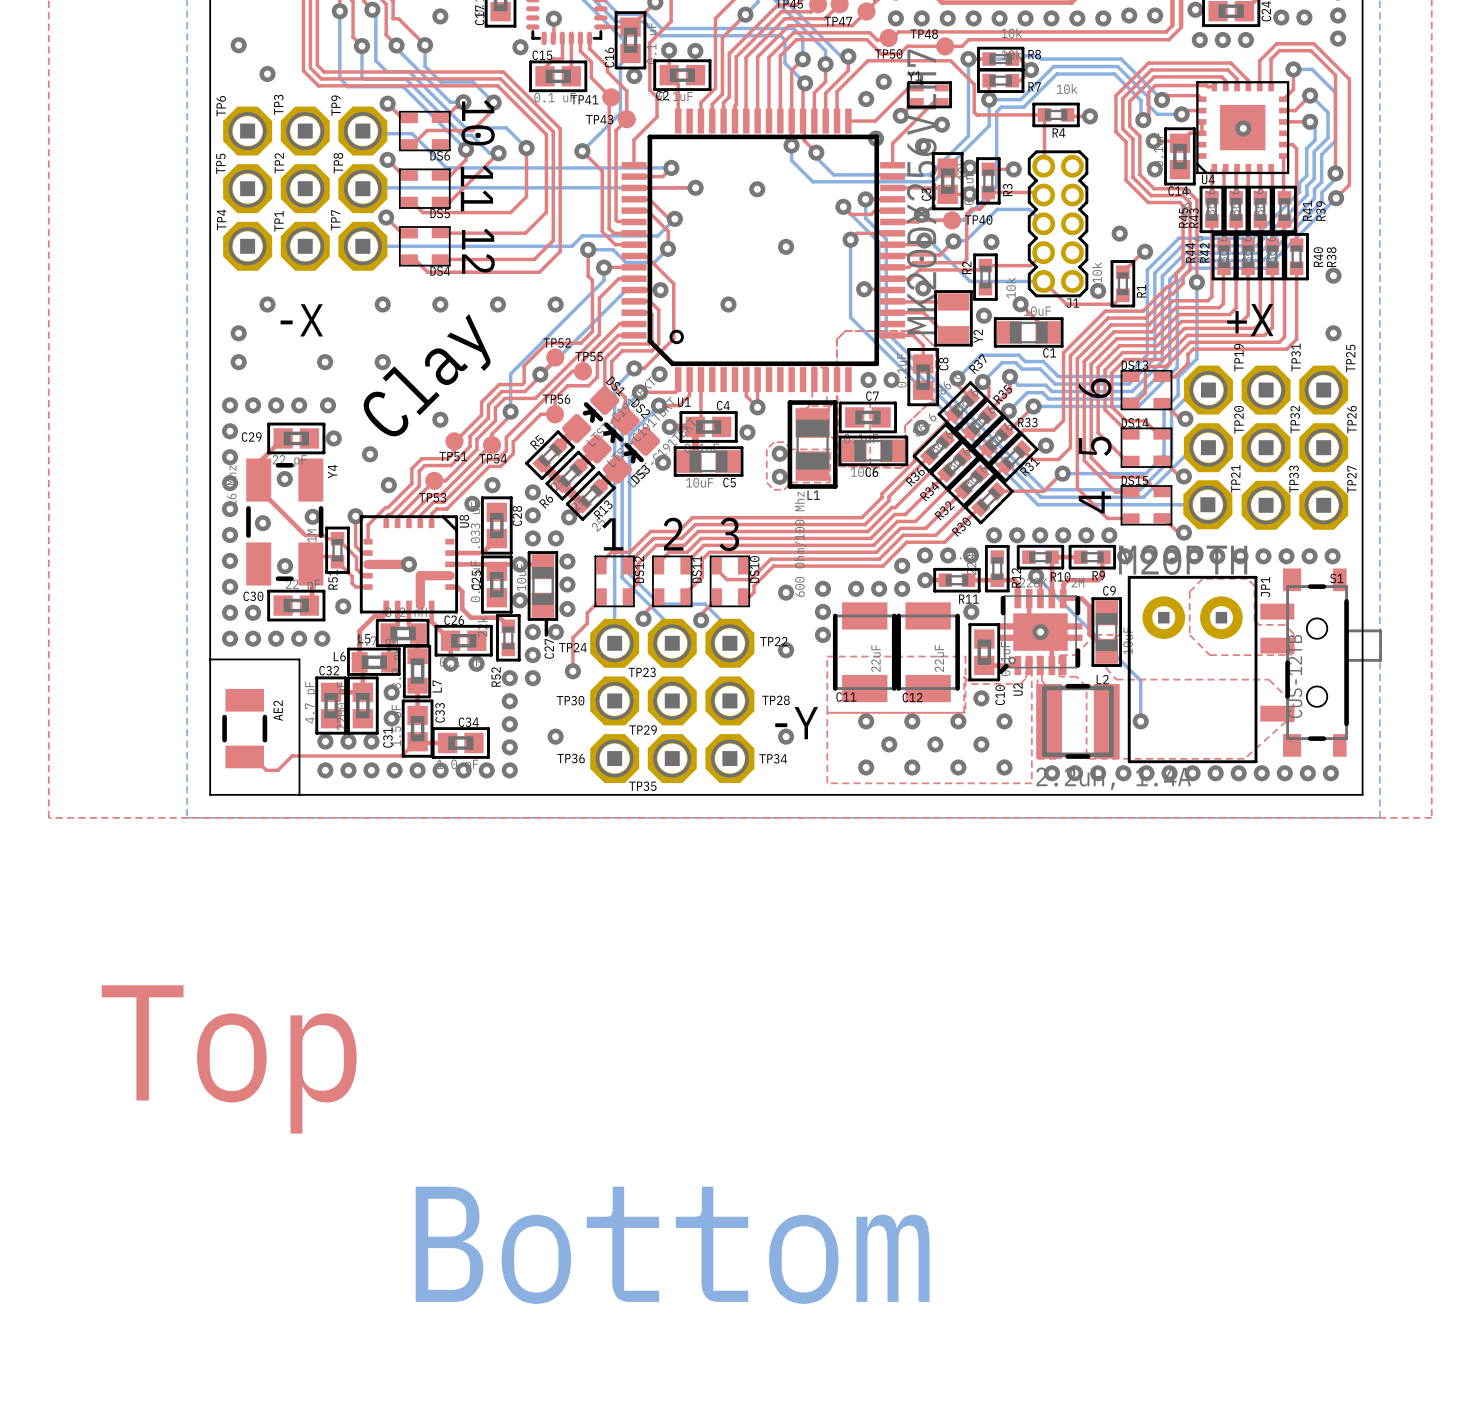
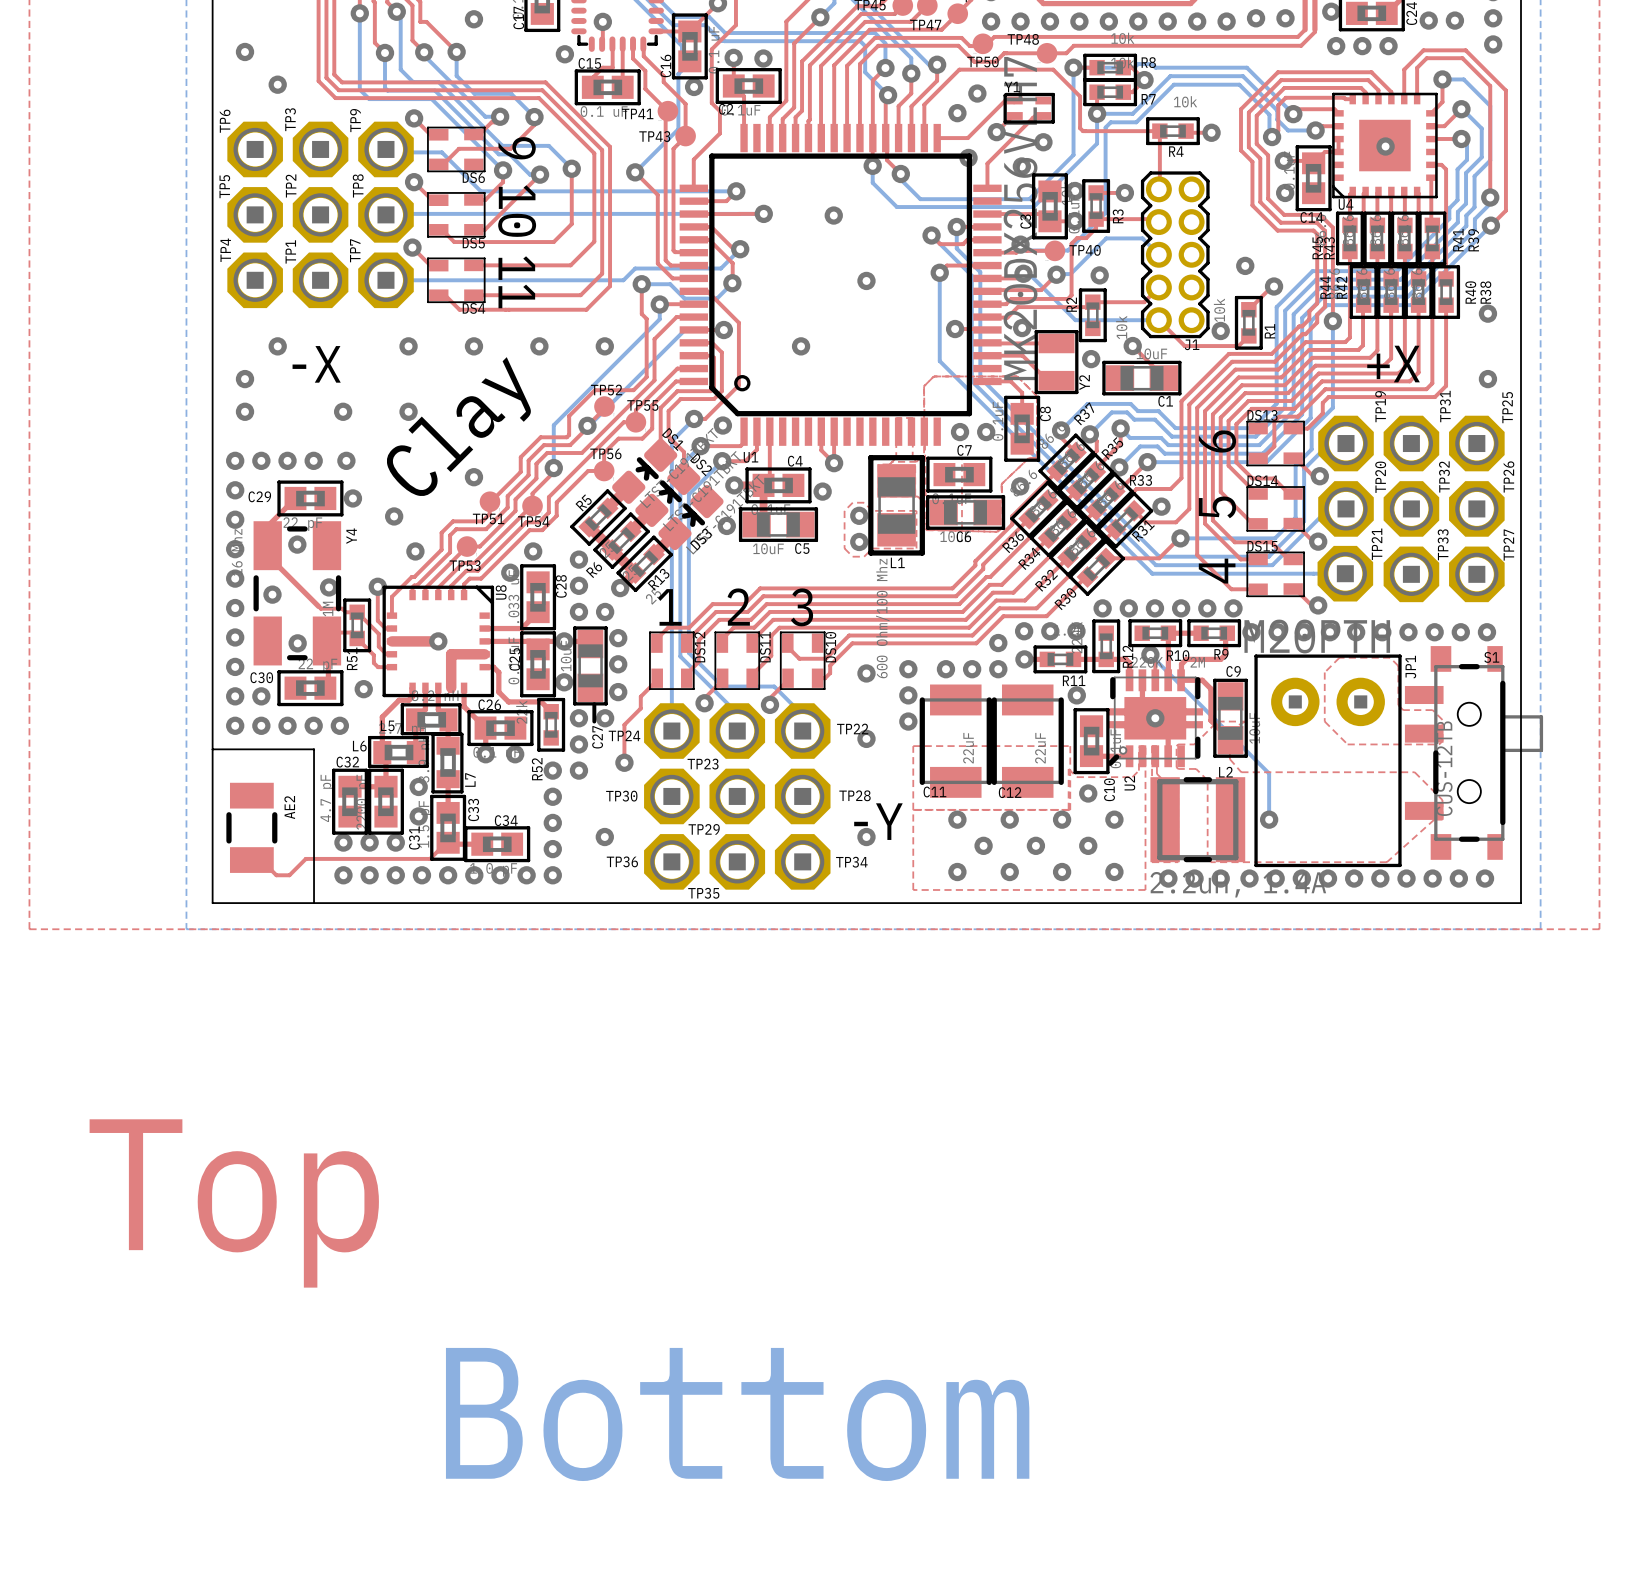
text position: 10 (478, 122) -> 10 (517, 211)
text: none -> 9 (517, 148)
text position: 11 (476, 188) -> 11 (516, 282)
text: 12 (478, 251) -> none

